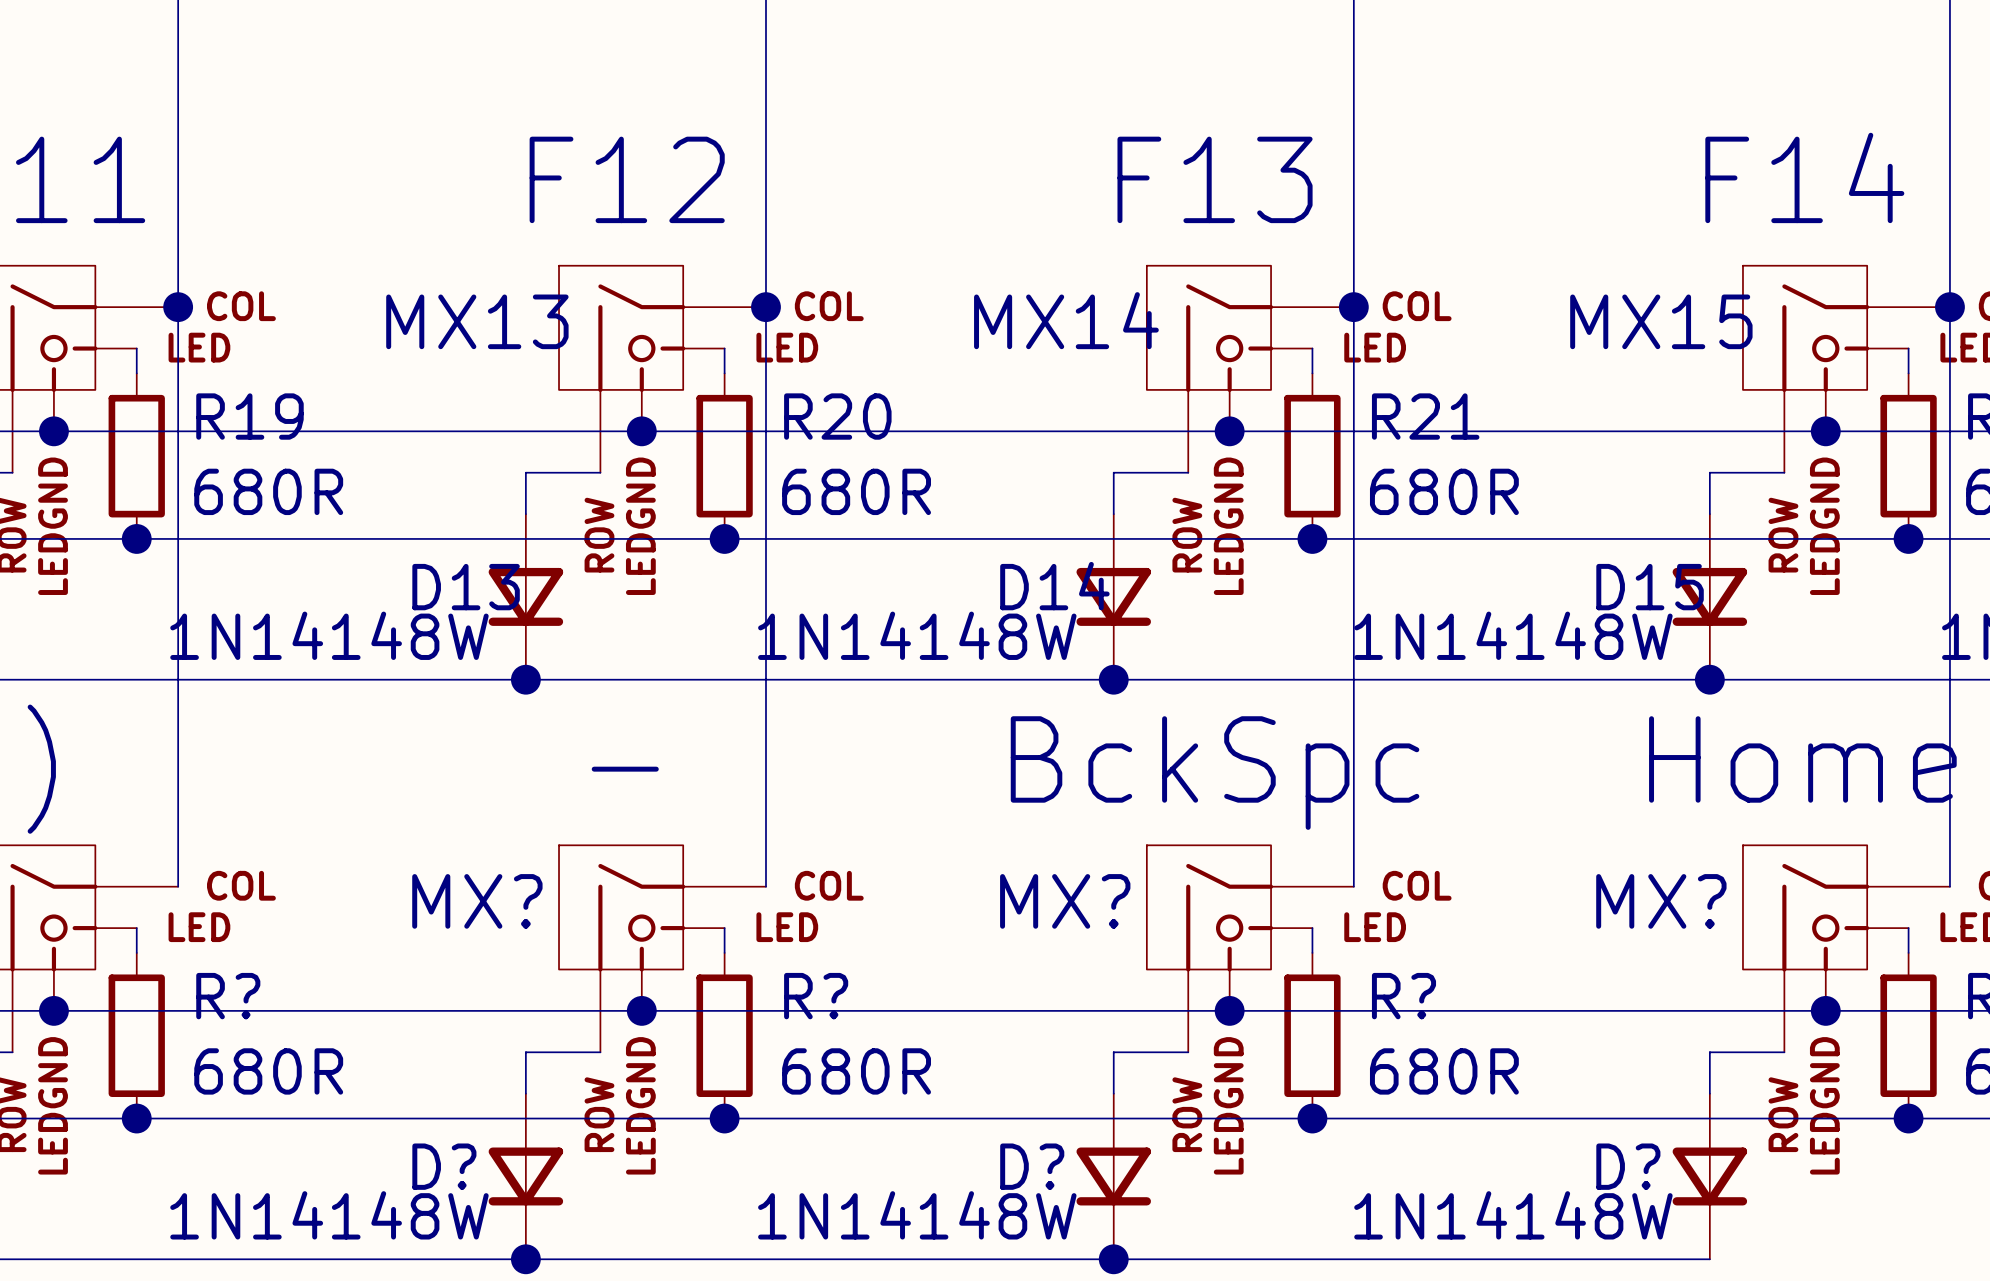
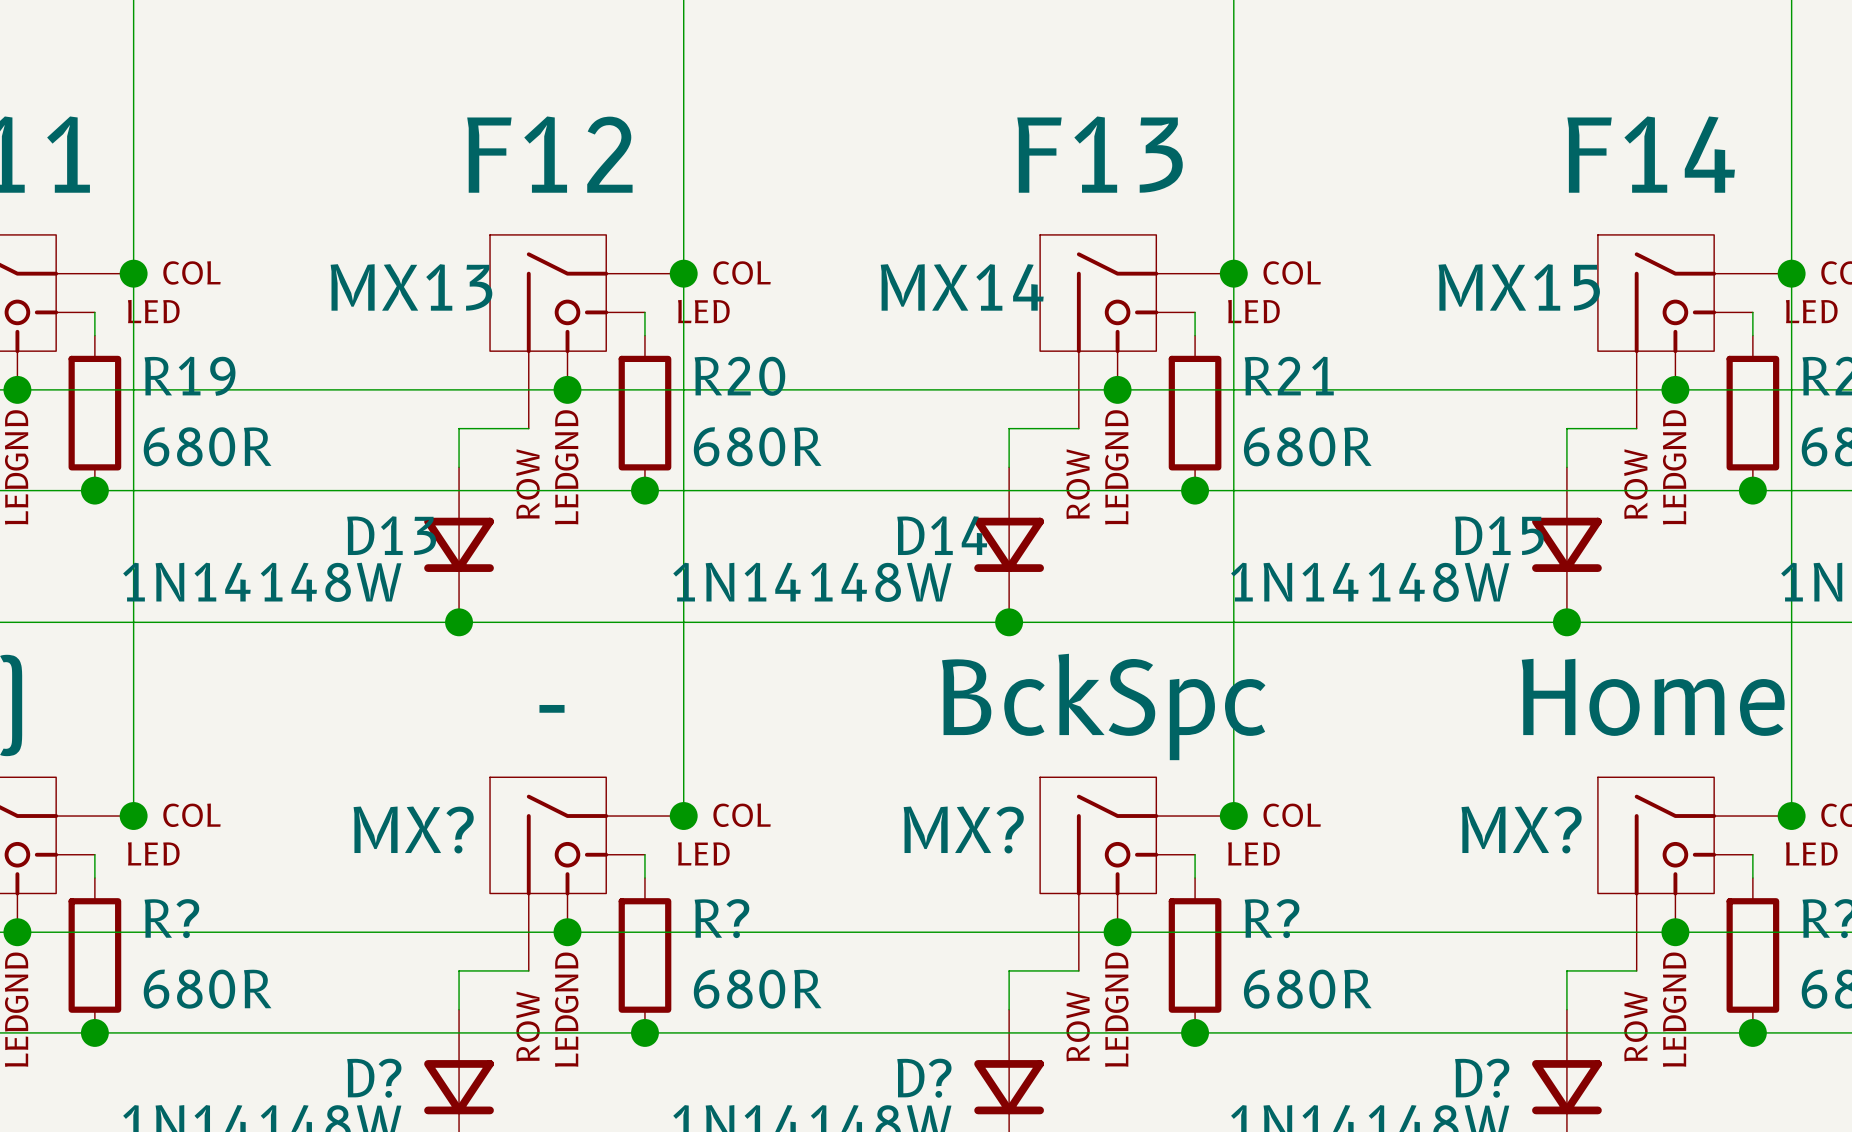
junction: none -> (133, 816)
junction: none -> (683, 816)
junction: none -> (1233, 816)
junction: none -> (1791, 816)

